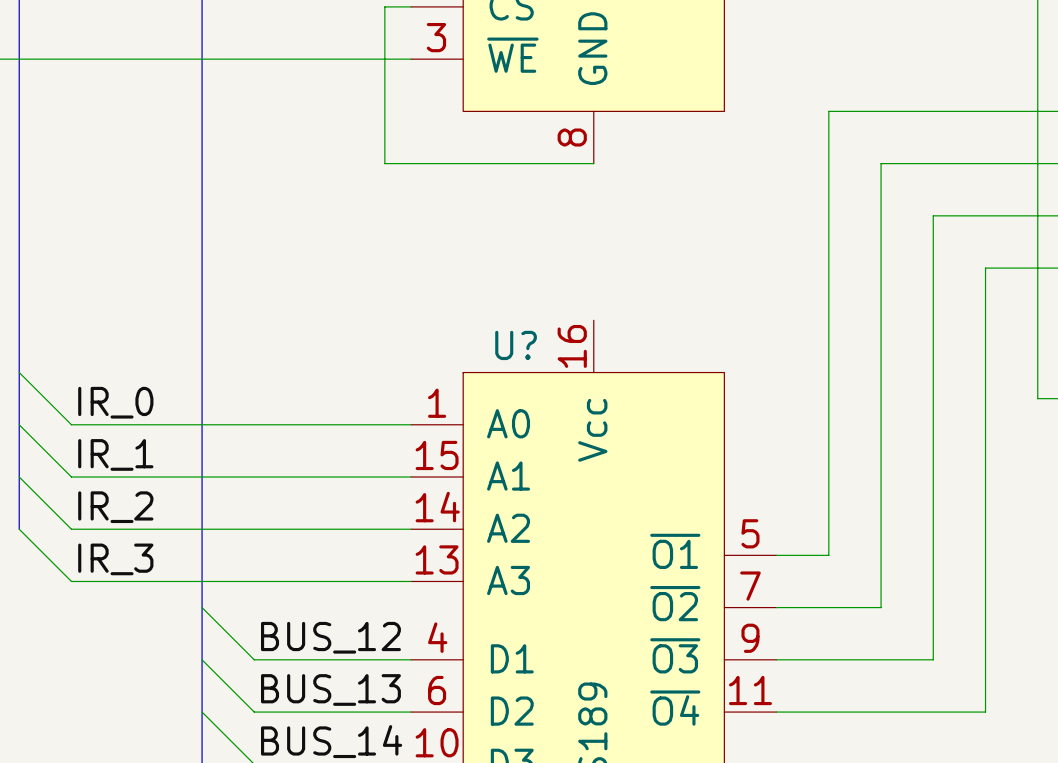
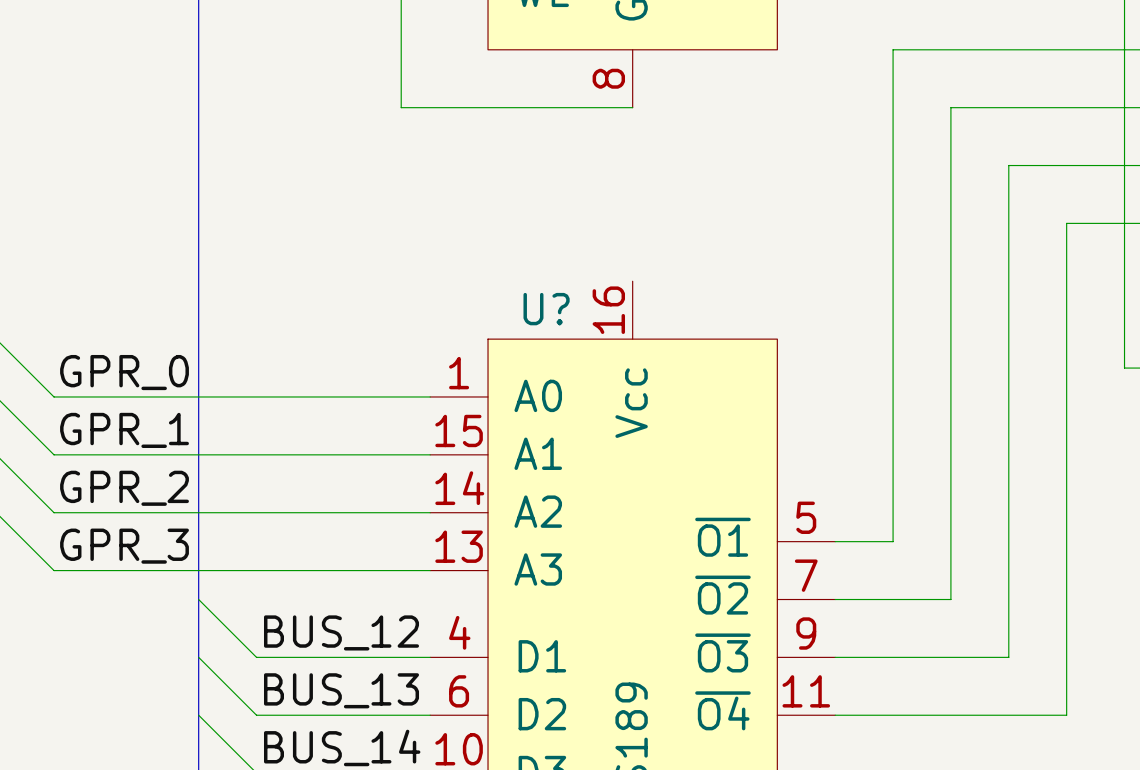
label: IR_0 (115, 402) -> GPR_0 (124, 372)
label: IR_1 (115, 454) -> GPR_1 (124, 430)
label: IR_2 (115, 507) -> GPR_2 (124, 488)
label: IR_3 (115, 559) -> GPR_3 (124, 546)

